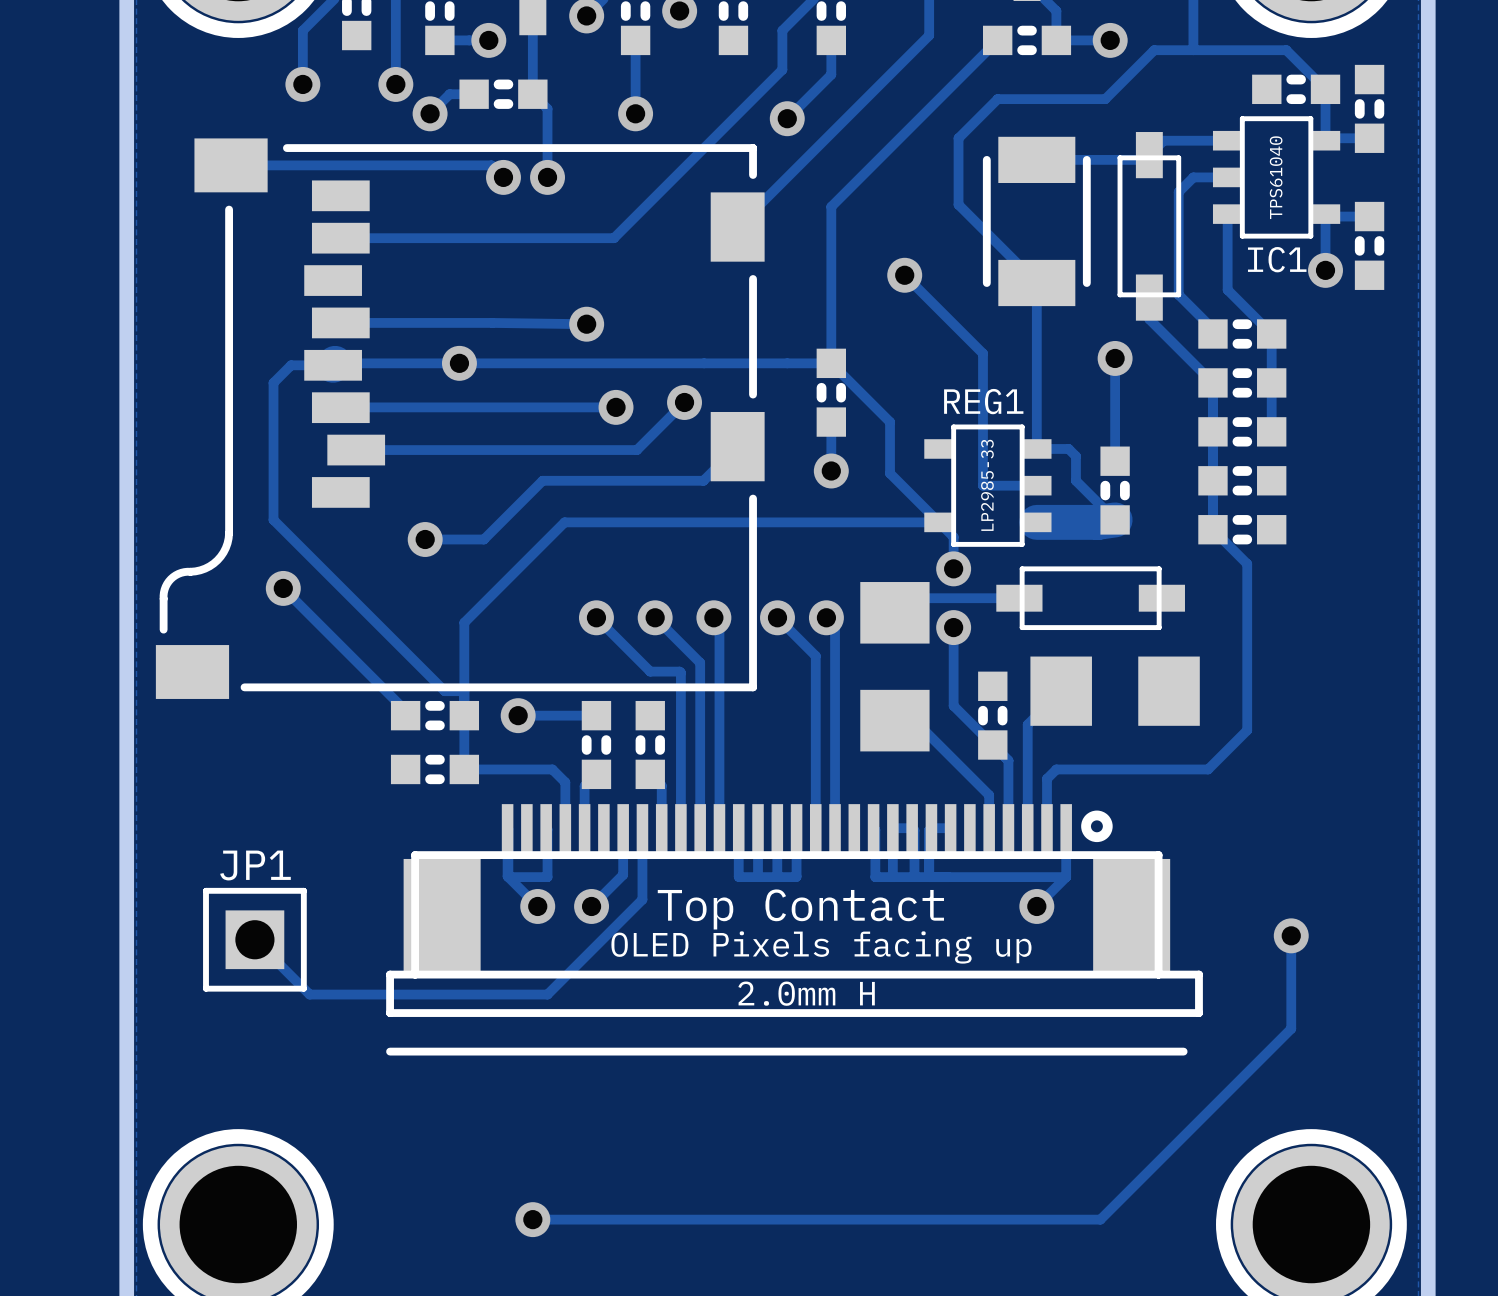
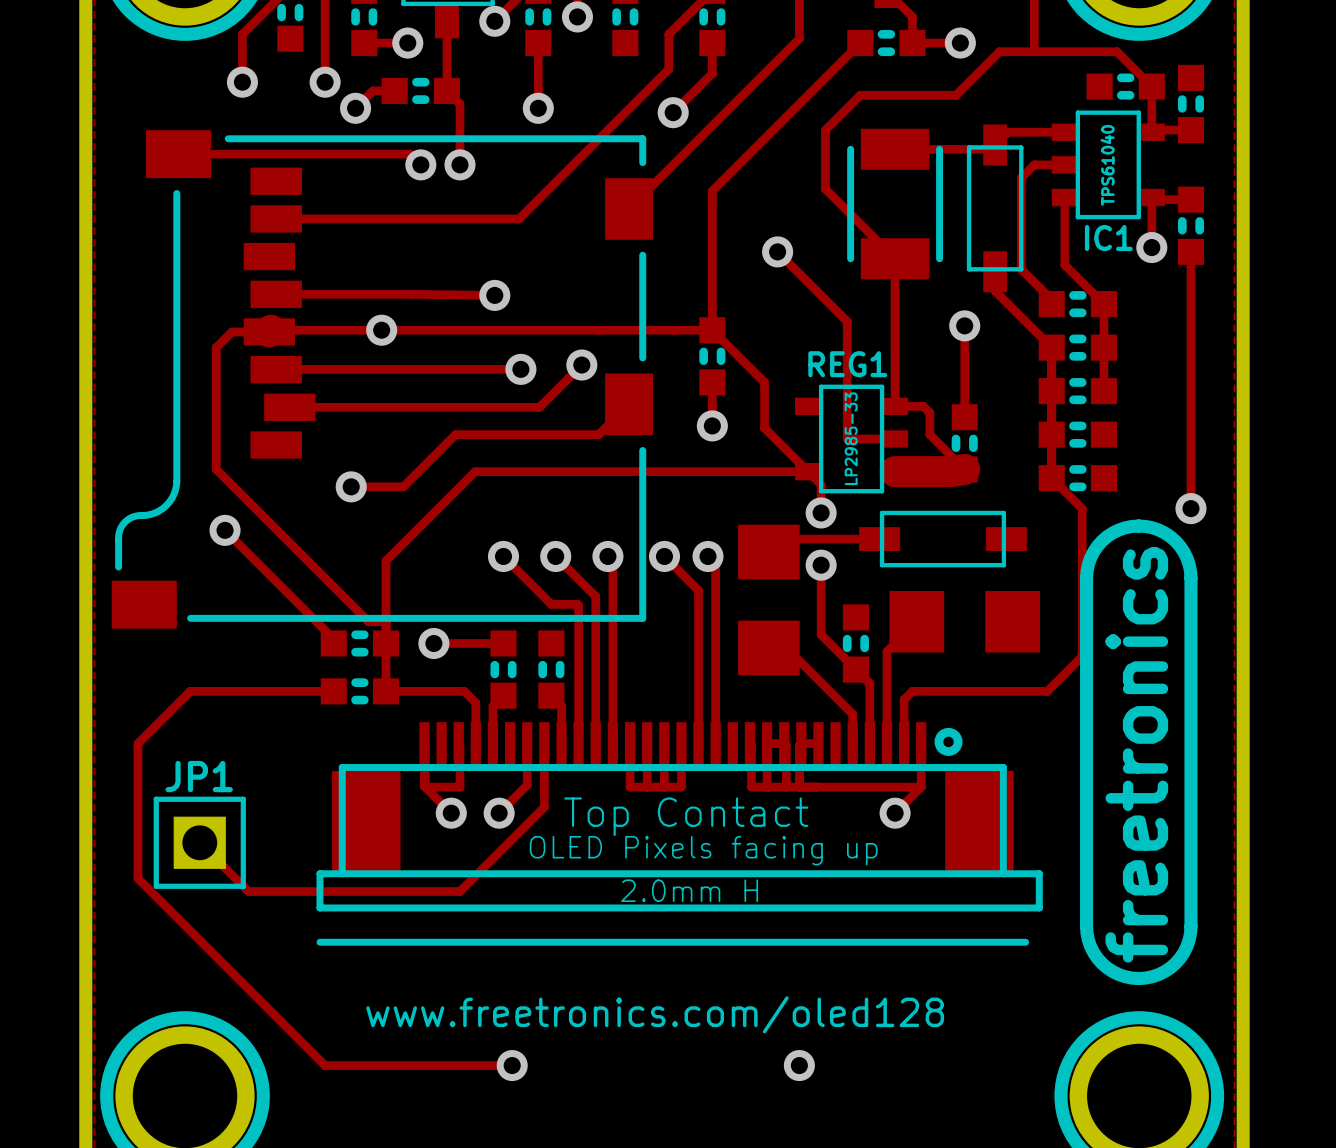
track: none -> (1190, 251) (1190, 508)
via: none -> (1190, 508)
drawing: none -> [1080, 519, 1198, 986]
track: none -> (333, 691) (190, 691) (138, 743) (138, 878) (325, 1065) (512, 1065)
track: (1291, 935) (1291, 1028) (1100, 1219) (532, 1219) -> none
via: (1291, 935) -> none
text: none -> www.freetronics.com/oled128 (655, 1014)
via: none -> (799, 1065)
via position: (532, 1219) -> (512, 1065)

